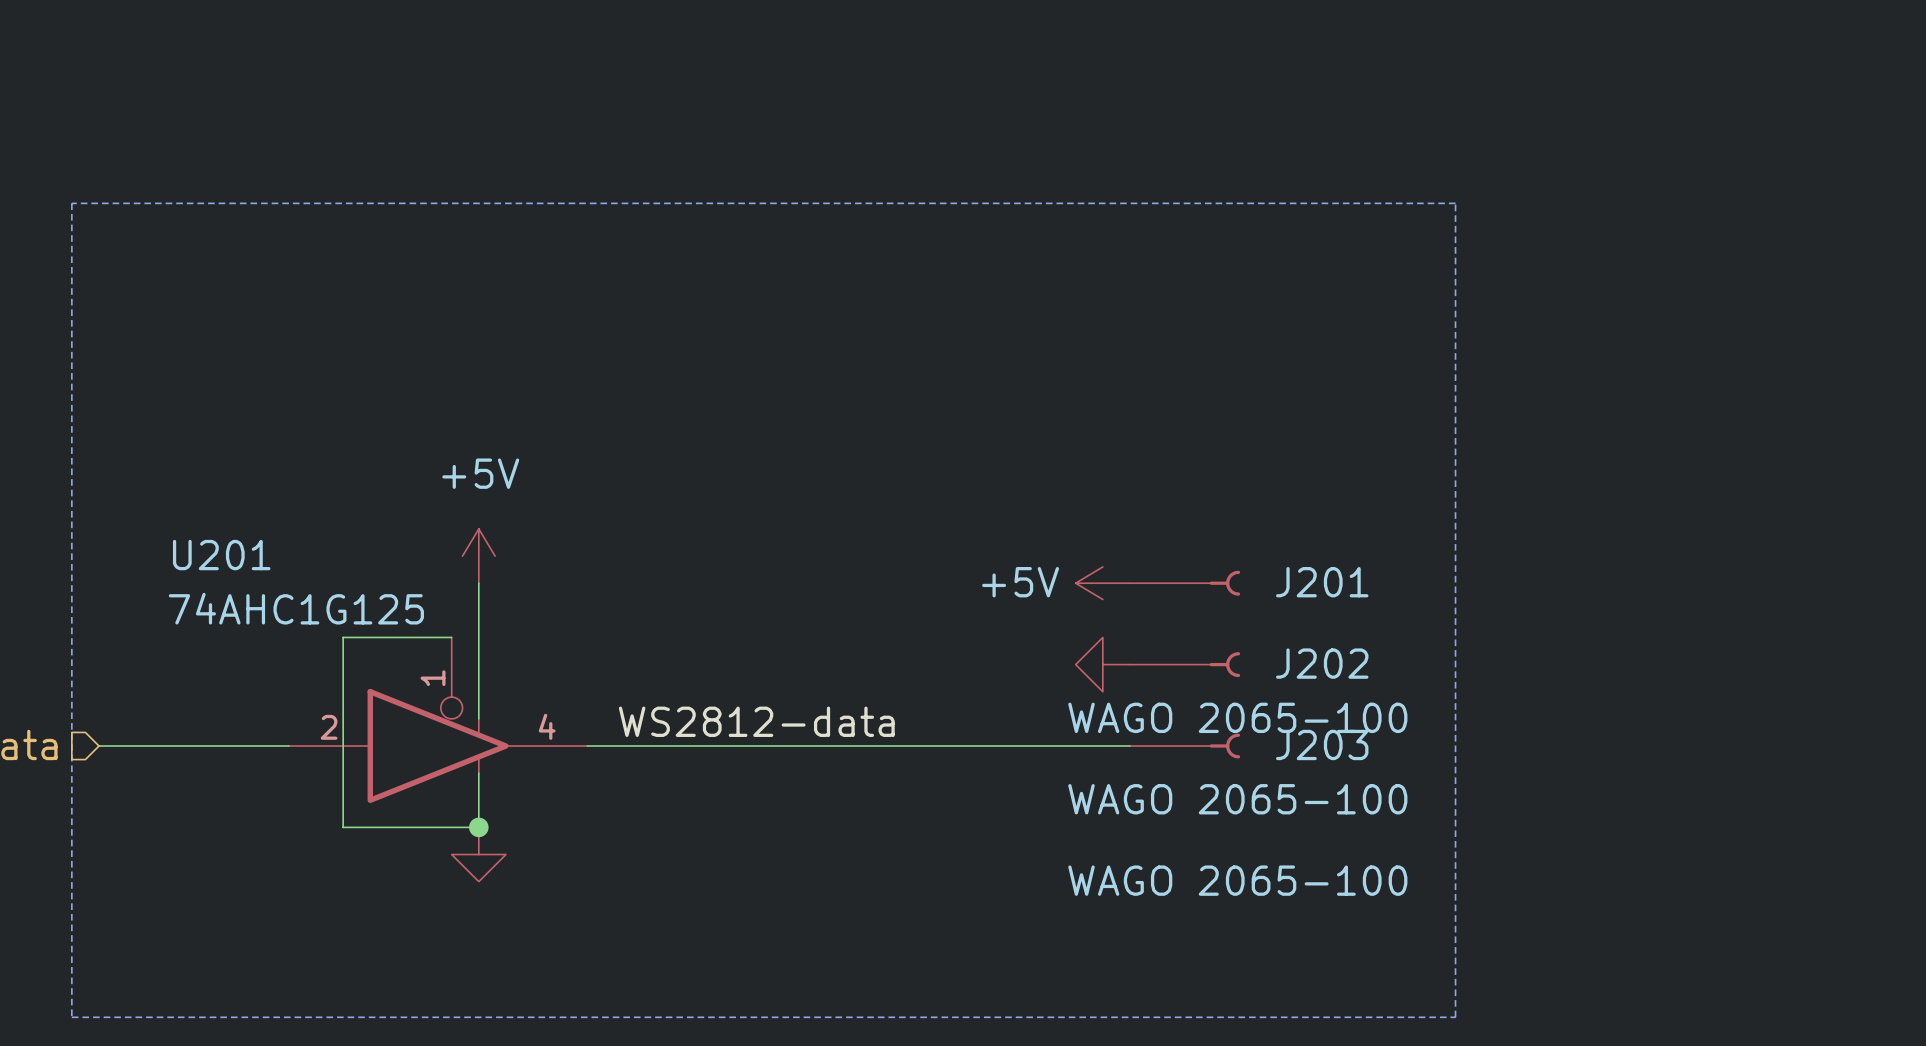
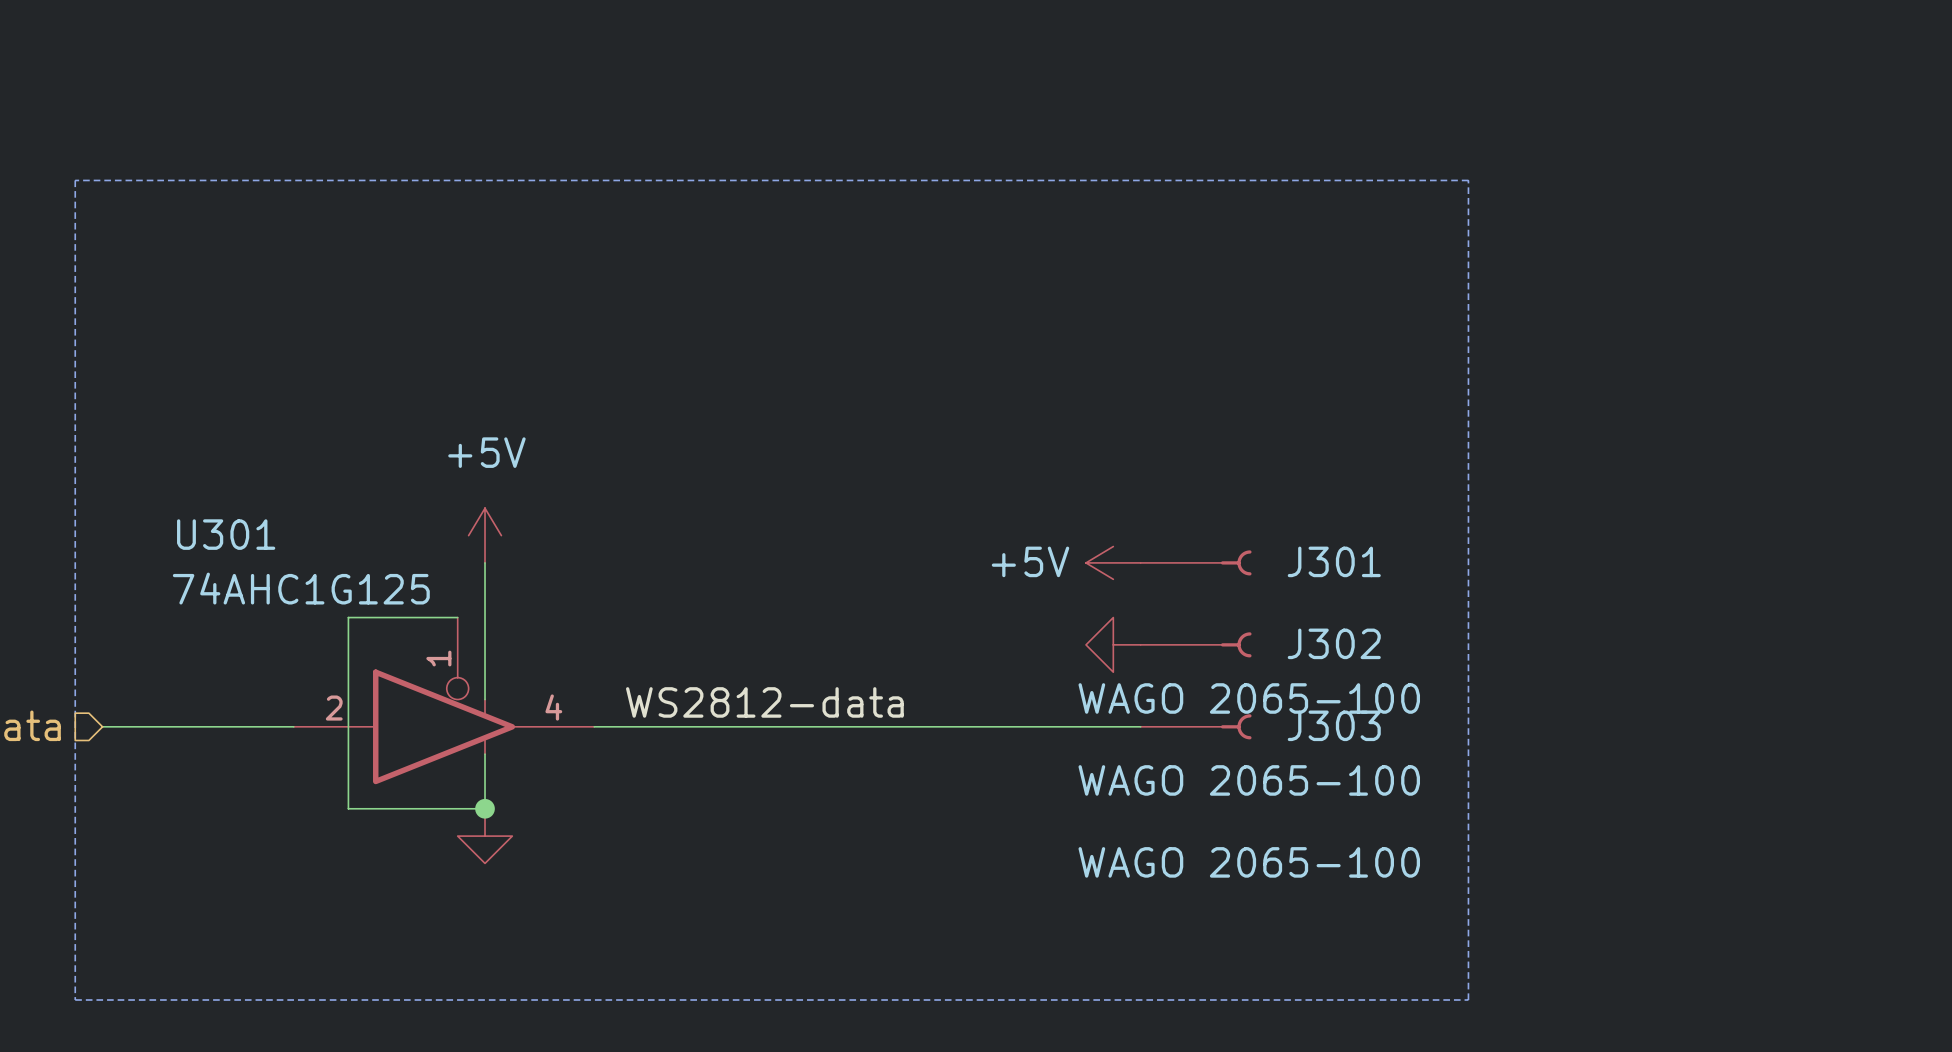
U201 name: U201 (221, 555) -> U301 (226, 534)
J201 name: J201 (1322, 582) -> J301 (1334, 561)
J202 name: J202 (1322, 663) -> J302 (1334, 643)
J203 name: J203 (1322, 744) -> J303 (1334, 725)

